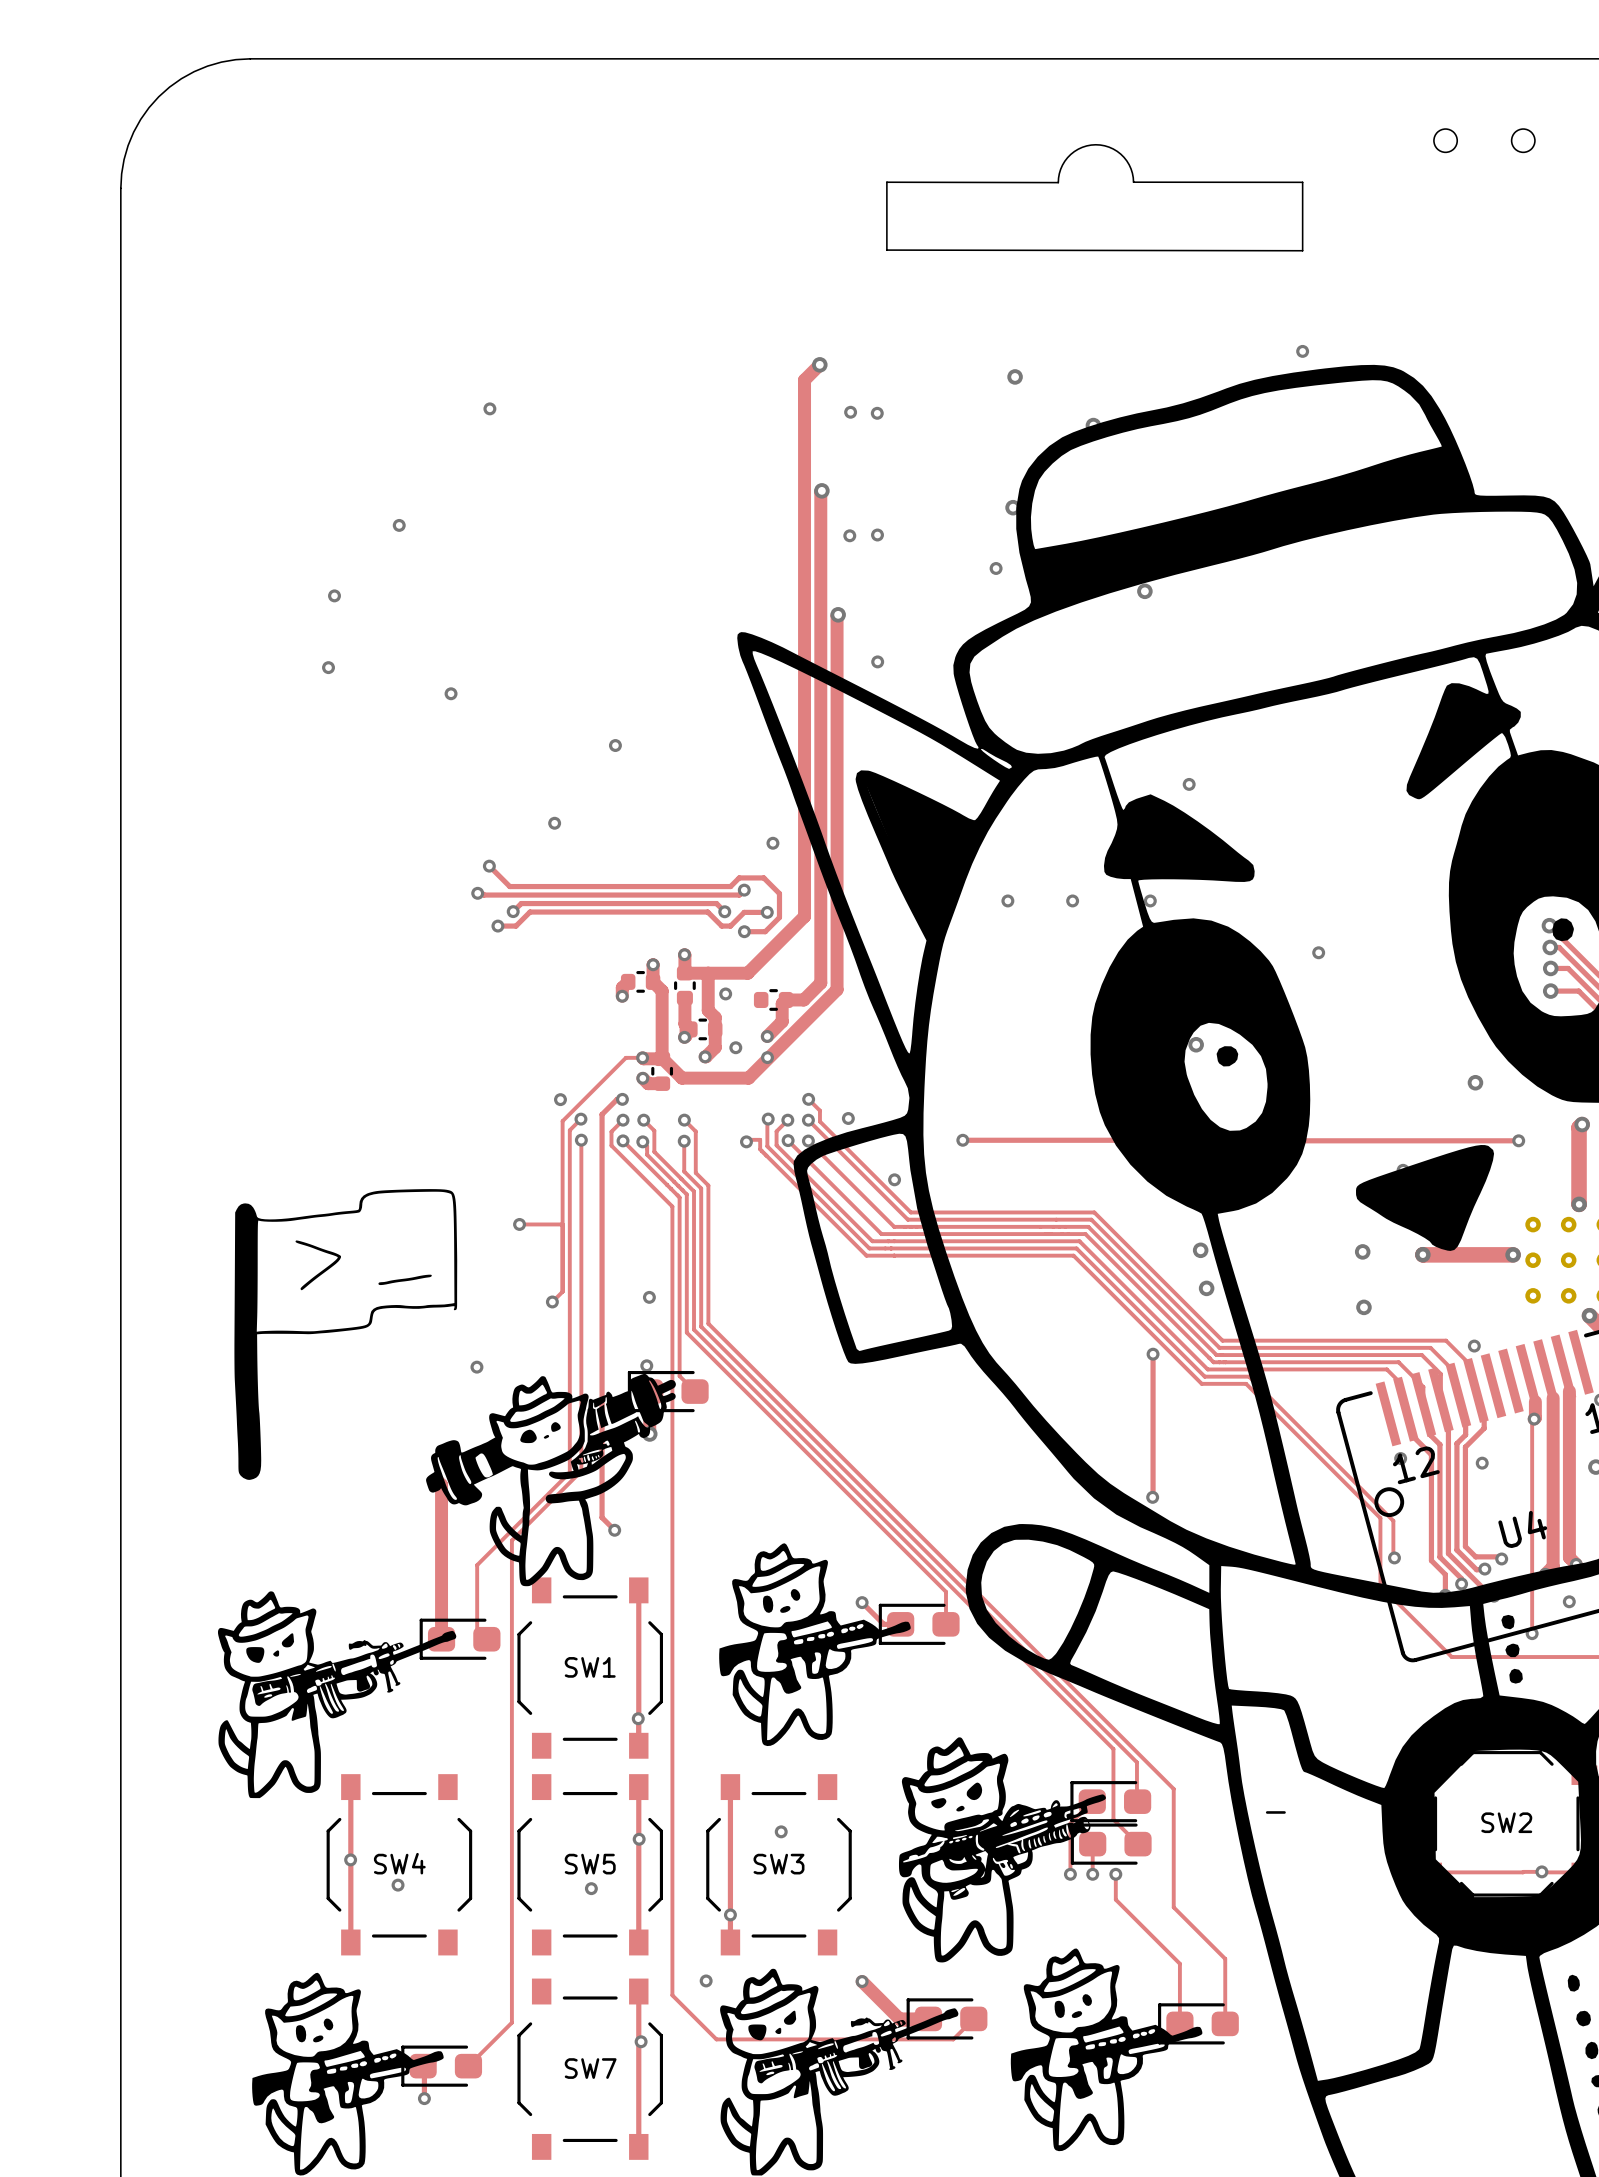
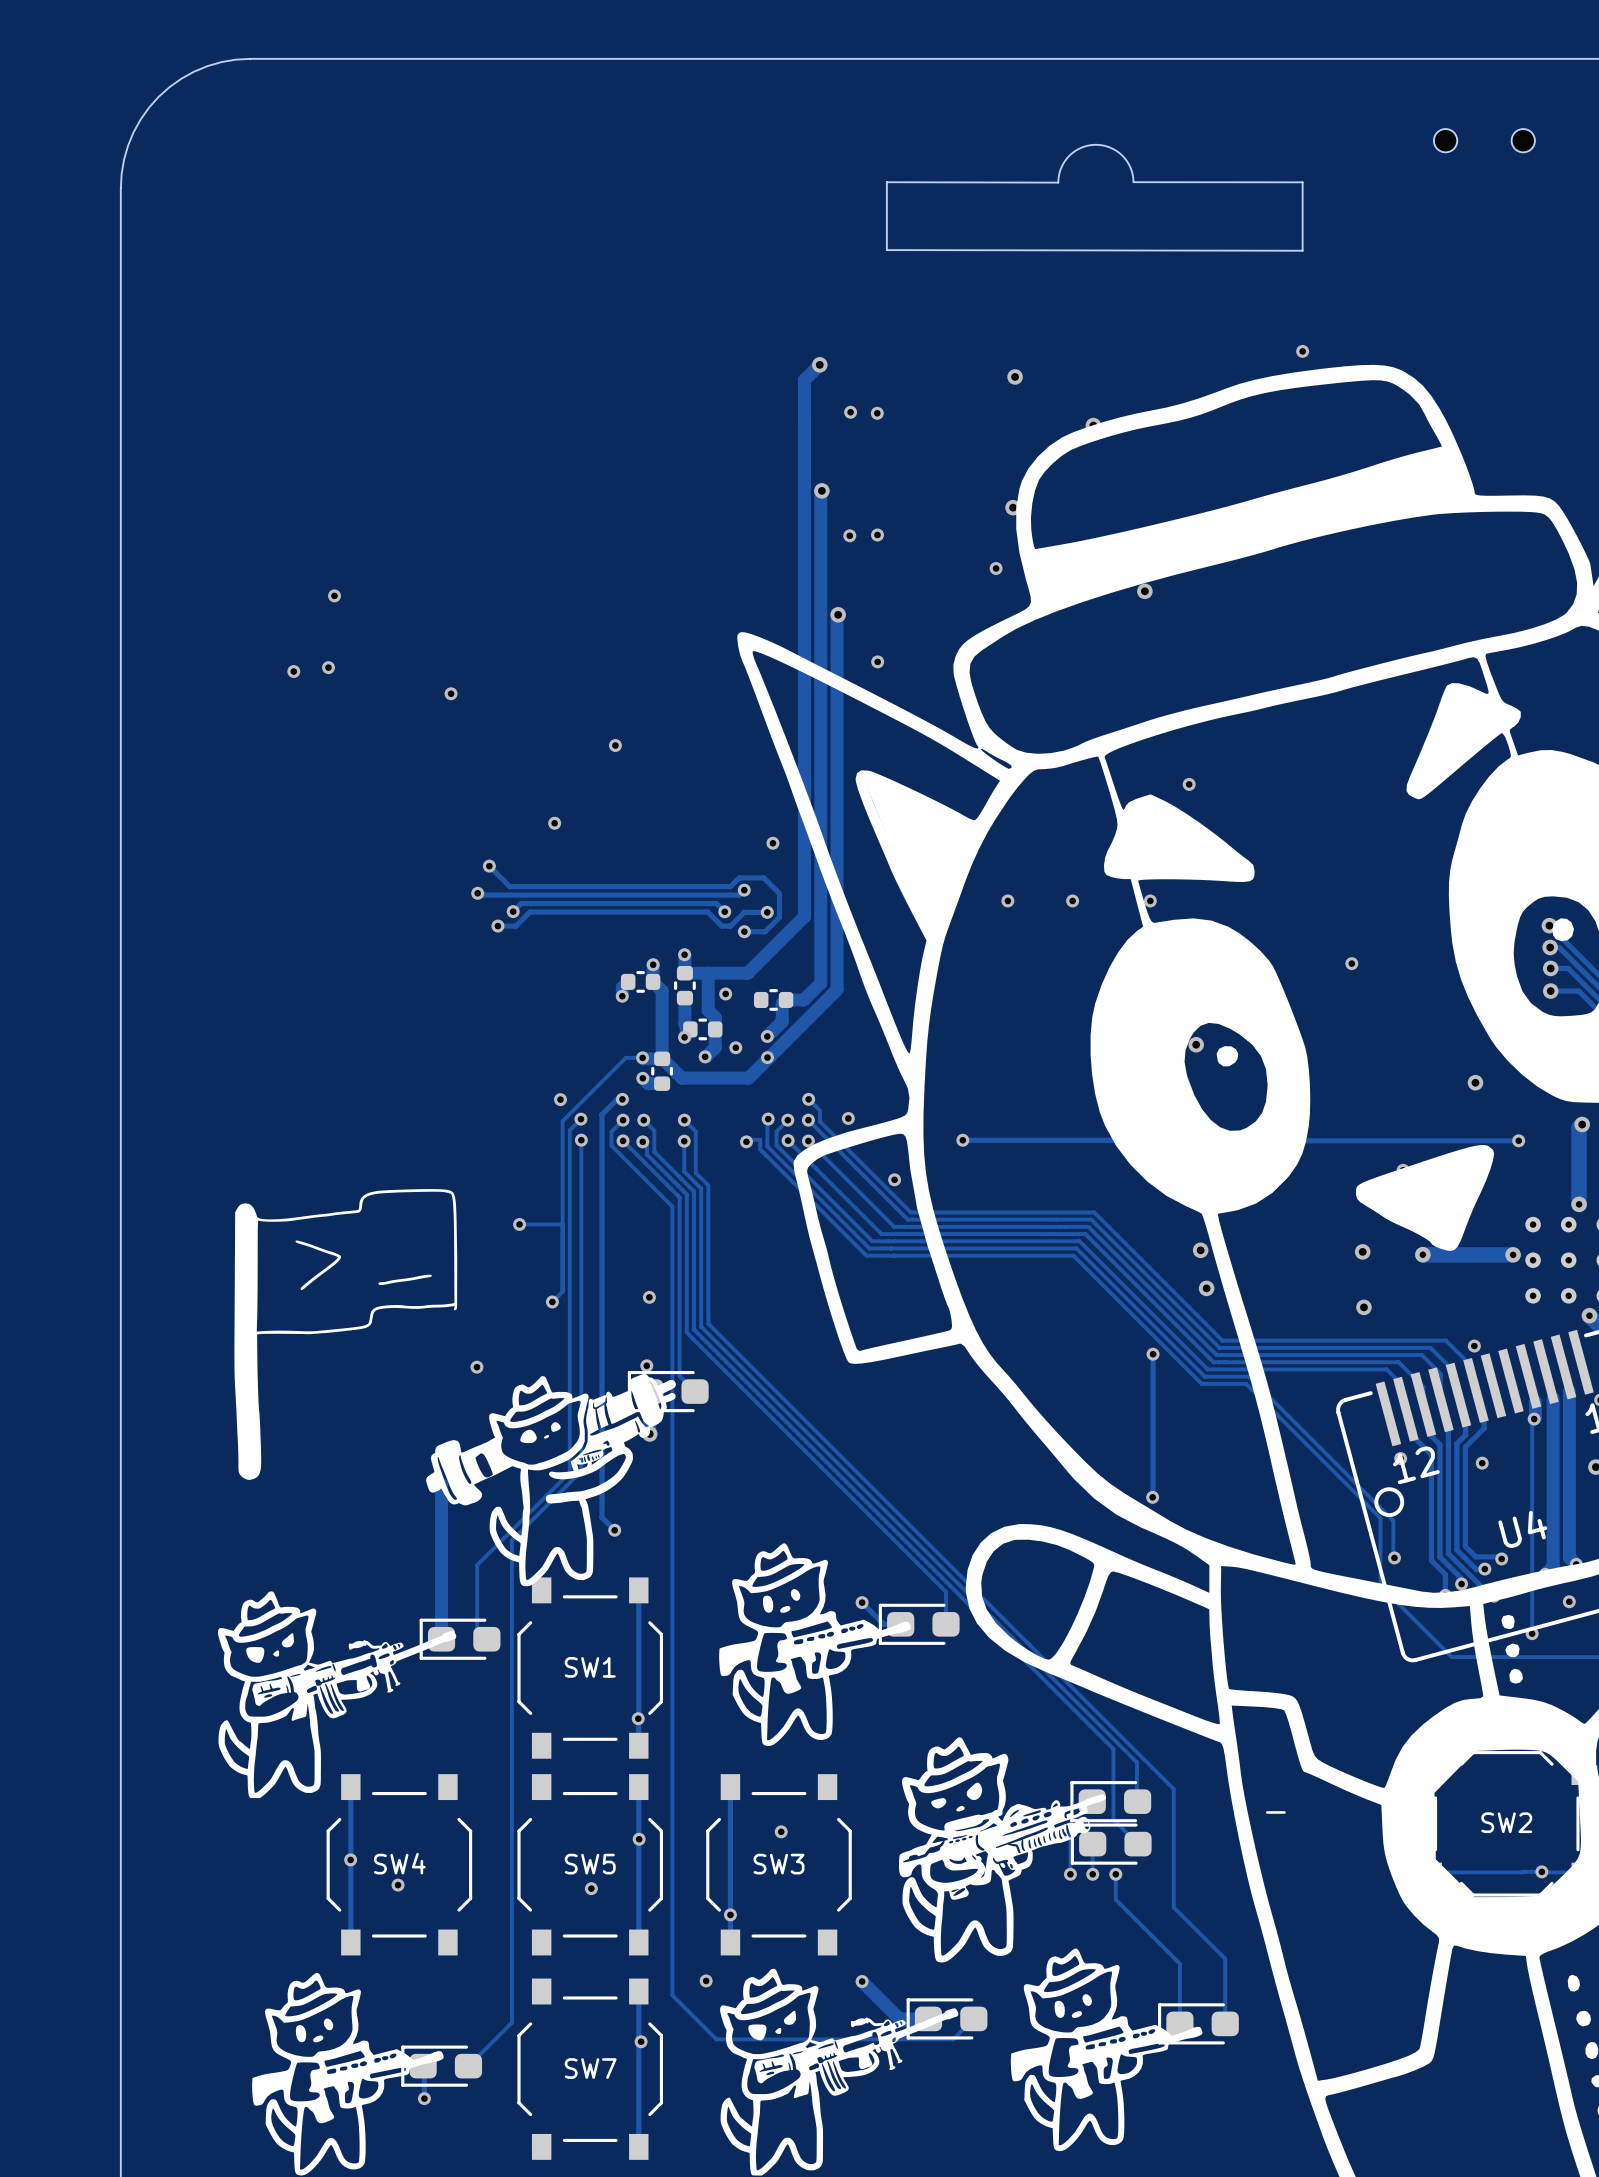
via: (489, 408) -> none
via: (399, 525) -> none
via: none -> (293, 671)
via position: (1318, 952) -> (1351, 963)

